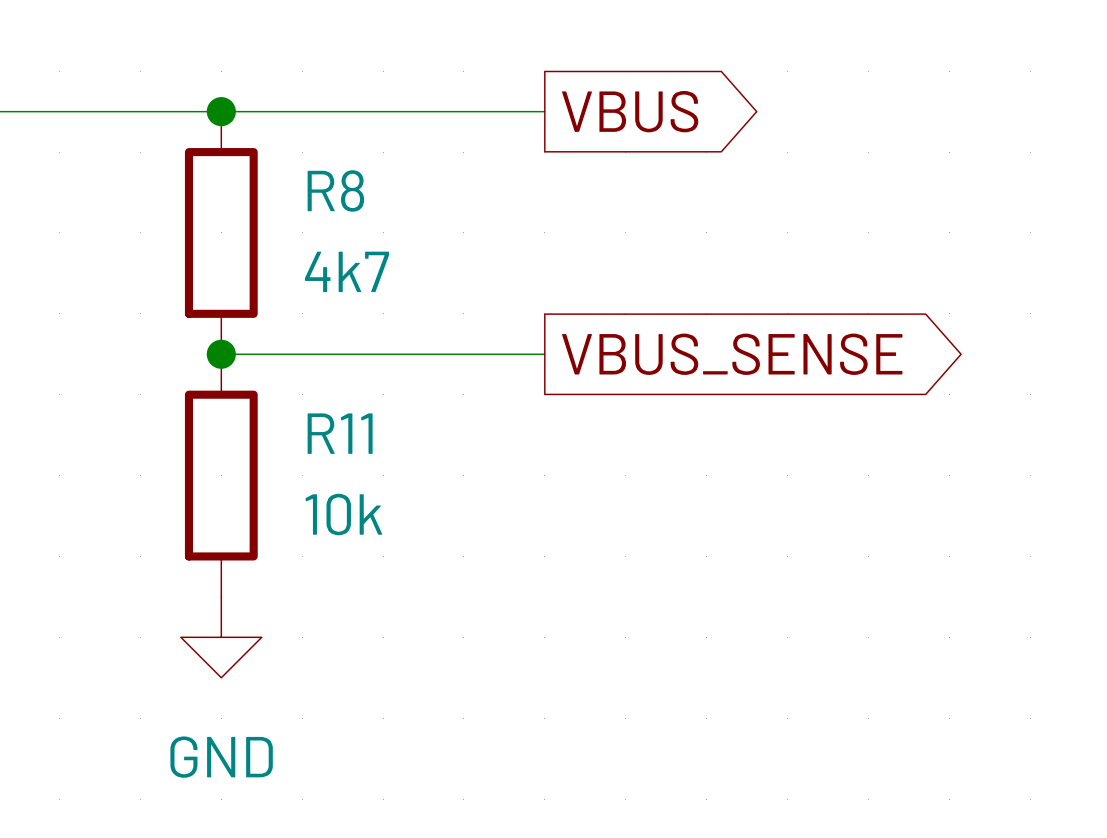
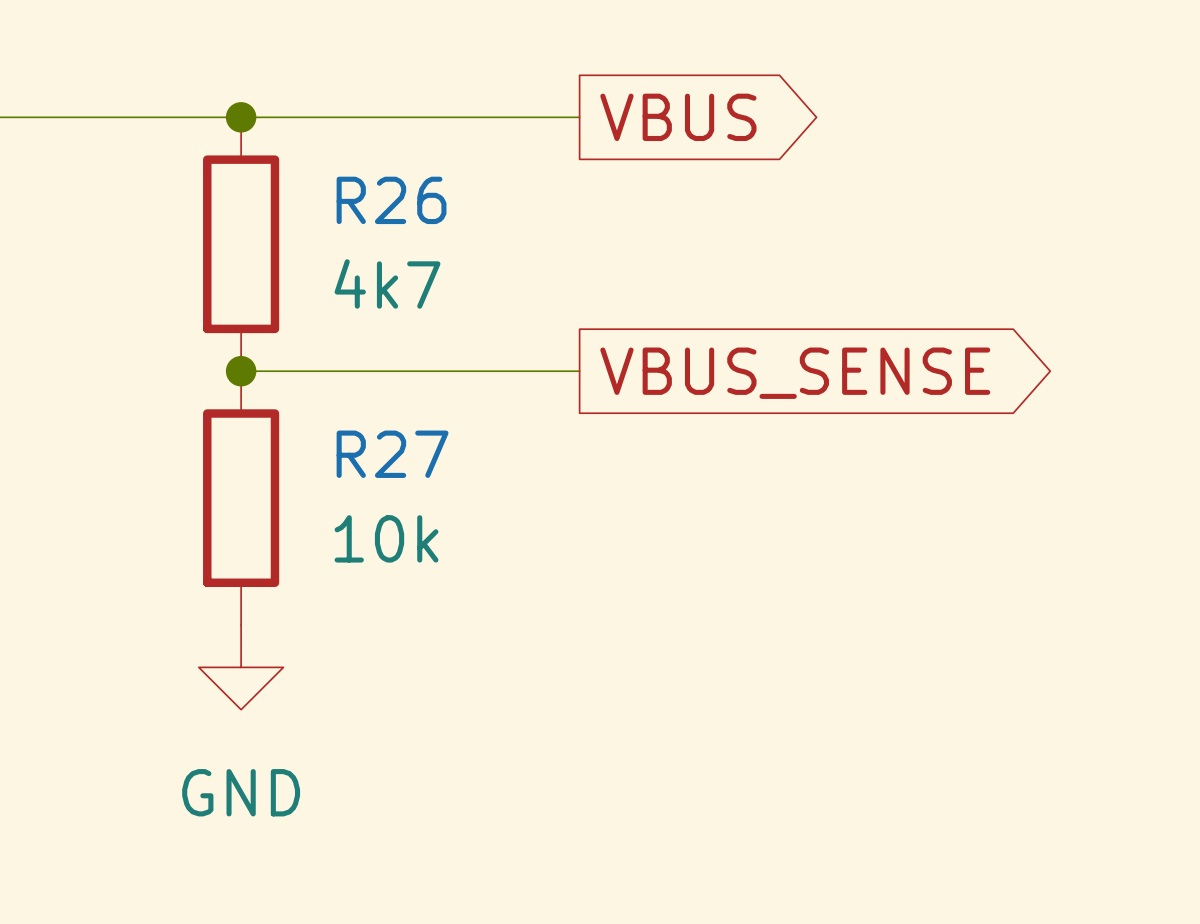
R8 name: R8 (335, 190) -> R26 (391, 200)
R11 name: R11 (340, 433) -> R27 (392, 454)

